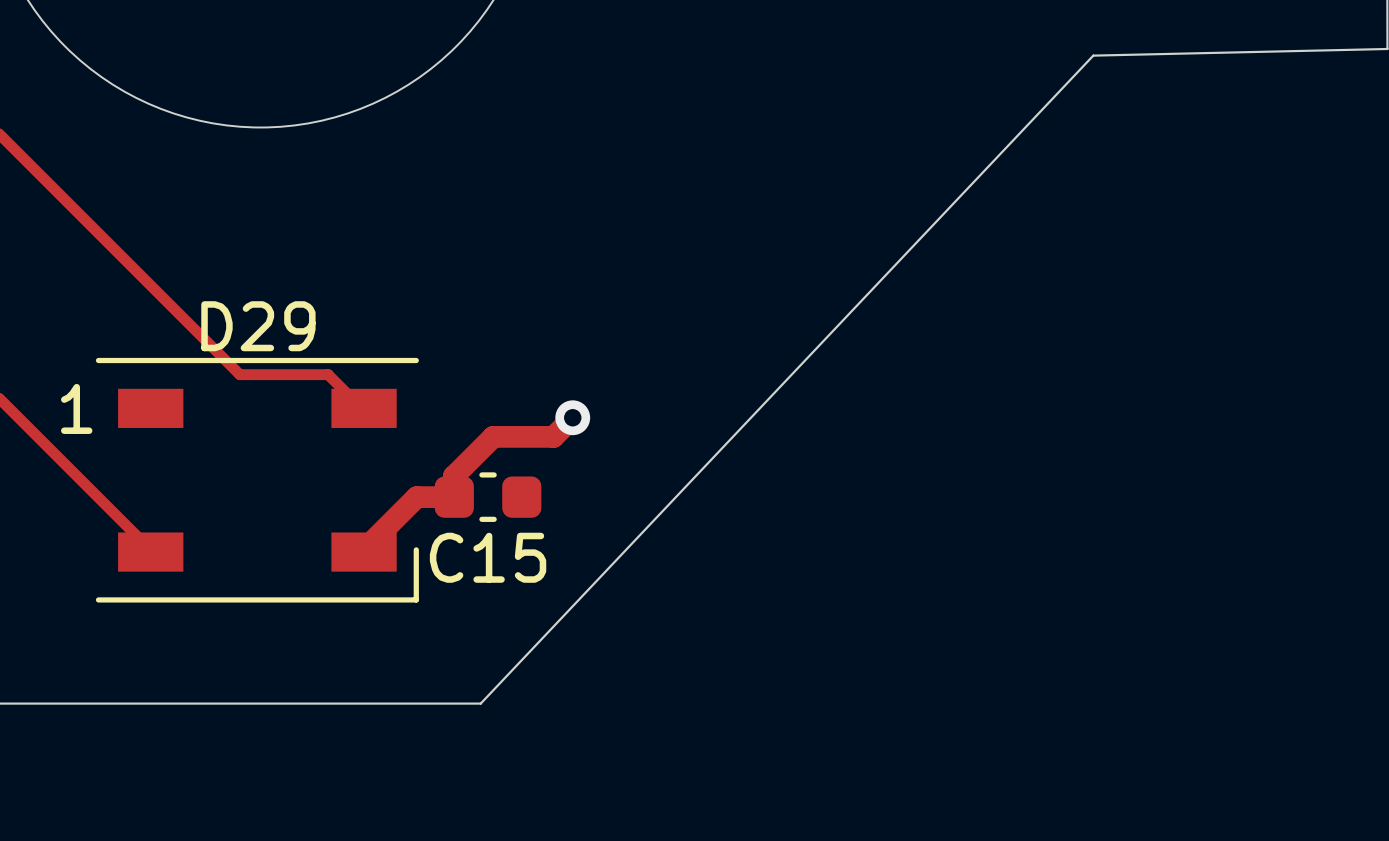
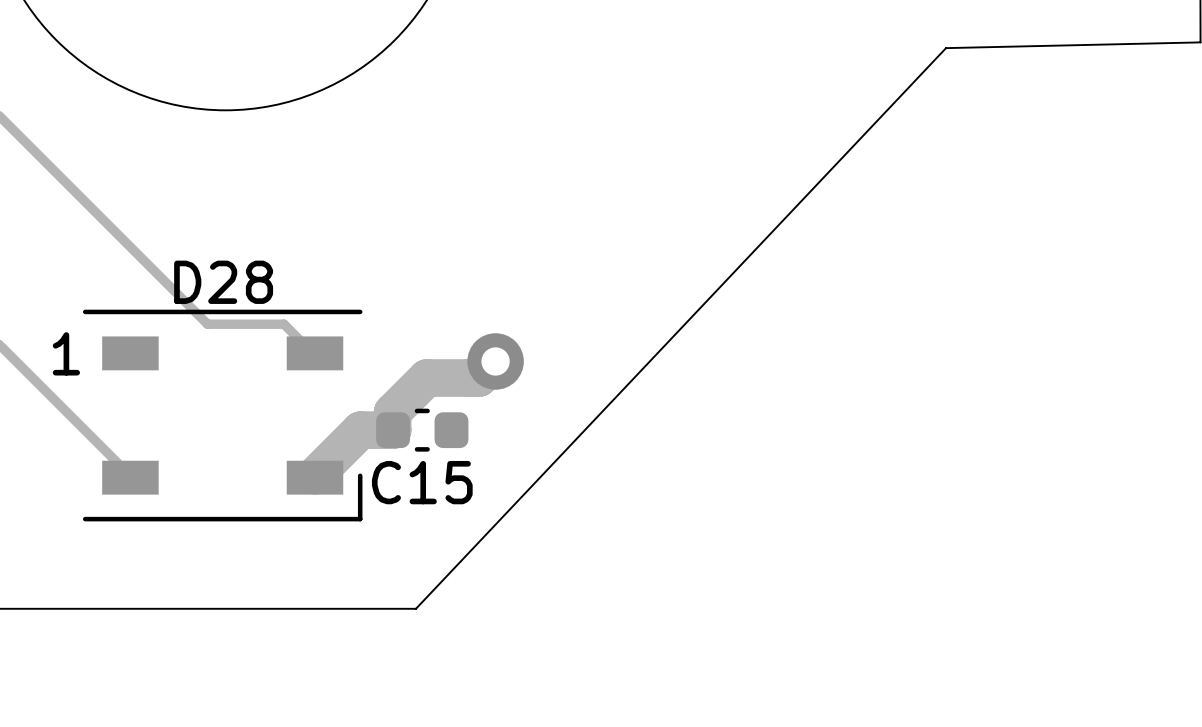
D29 name: D29 (258, 326) -> D28 (223, 282)
via size: [555, 400, 591, 436] -> [467, 333, 524, 390]
track width: thin (572, 417) (553, 436) (493, 436) (453, 476) (453, 497) (416, 497) (364, 549) -> thick (495, 361) (479, 378) (426, 378) (392, 412) (392, 430) (360, 430) (315, 475)

